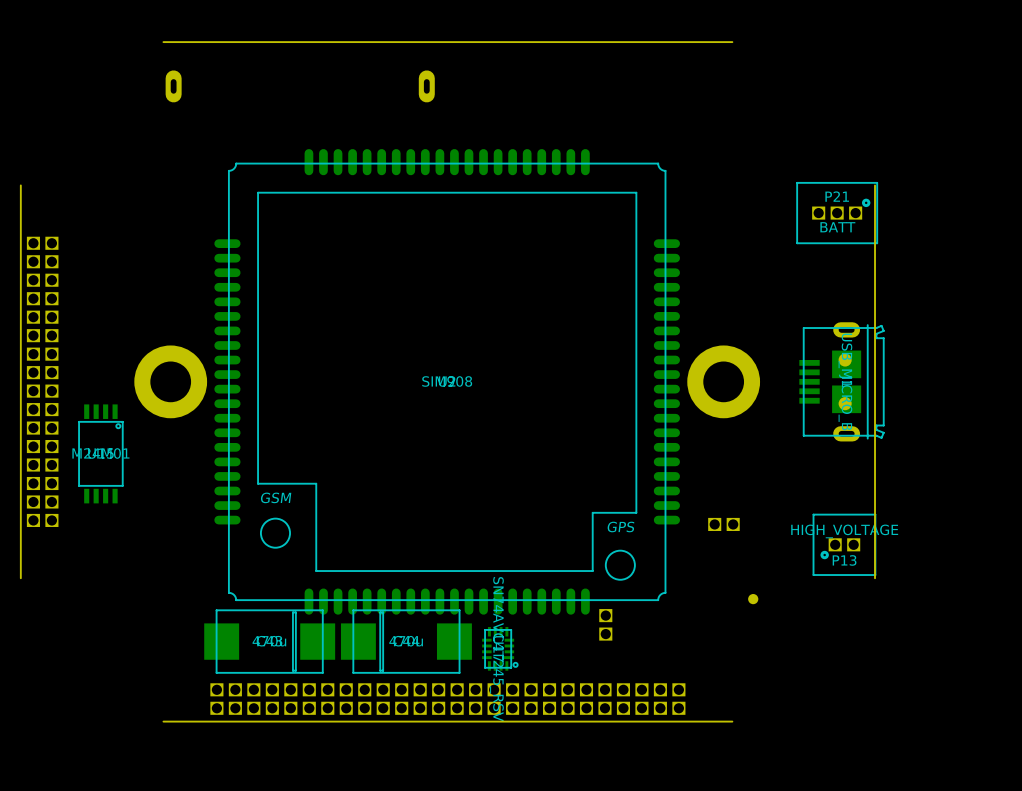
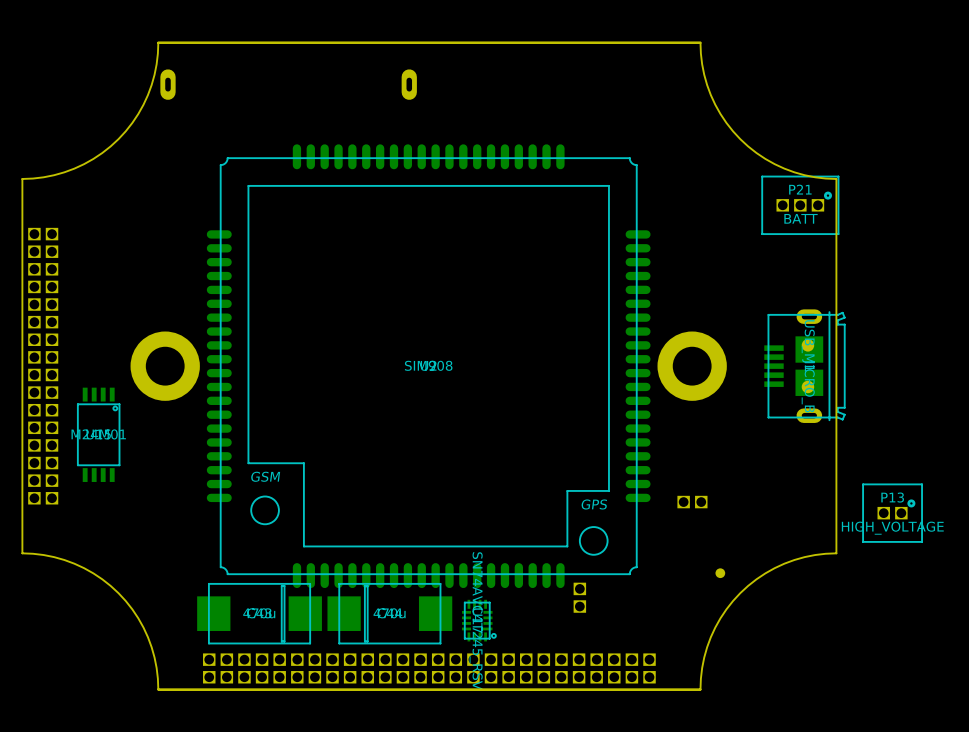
board edge: none -> (836, 178) (804, 175) (784, 168) (756, 153) (740, 139) (726, 122) (710, 95) (702, 64) (700, 43) (158, 43) (156, 64) (147, 95) (132, 122) (118, 139) (102, 153) (74, 168) (43, 177) (22, 178)
P13 rotation: 0° (844, 544) -> 180° (892, 513)
P13 position: (844, 544) -> (892, 513)
board edge: none -> (836, 553) (804, 557) (784, 563) (756, 579) (740, 593) (726, 609) (710, 637) (704, 657) (700, 689) (158, 689) (156, 668) (147, 637) (138, 618) (118, 593) (93, 573) (74, 563) (43, 555) (22, 553)

